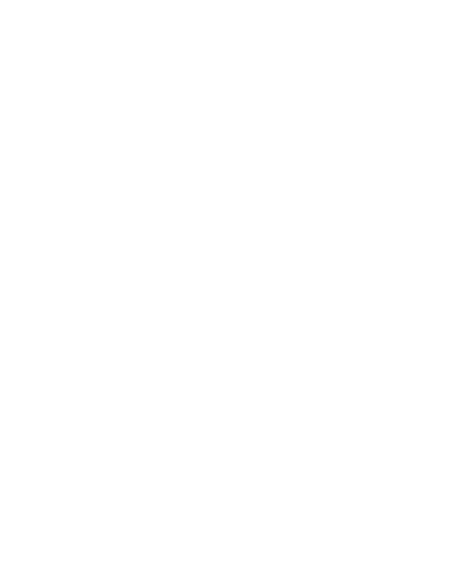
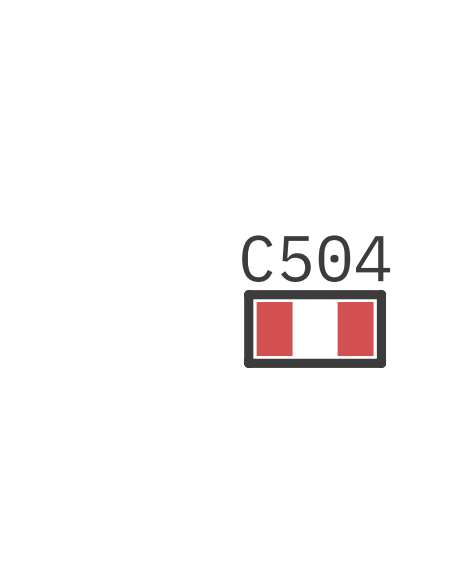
C504: none -> (315, 329)

